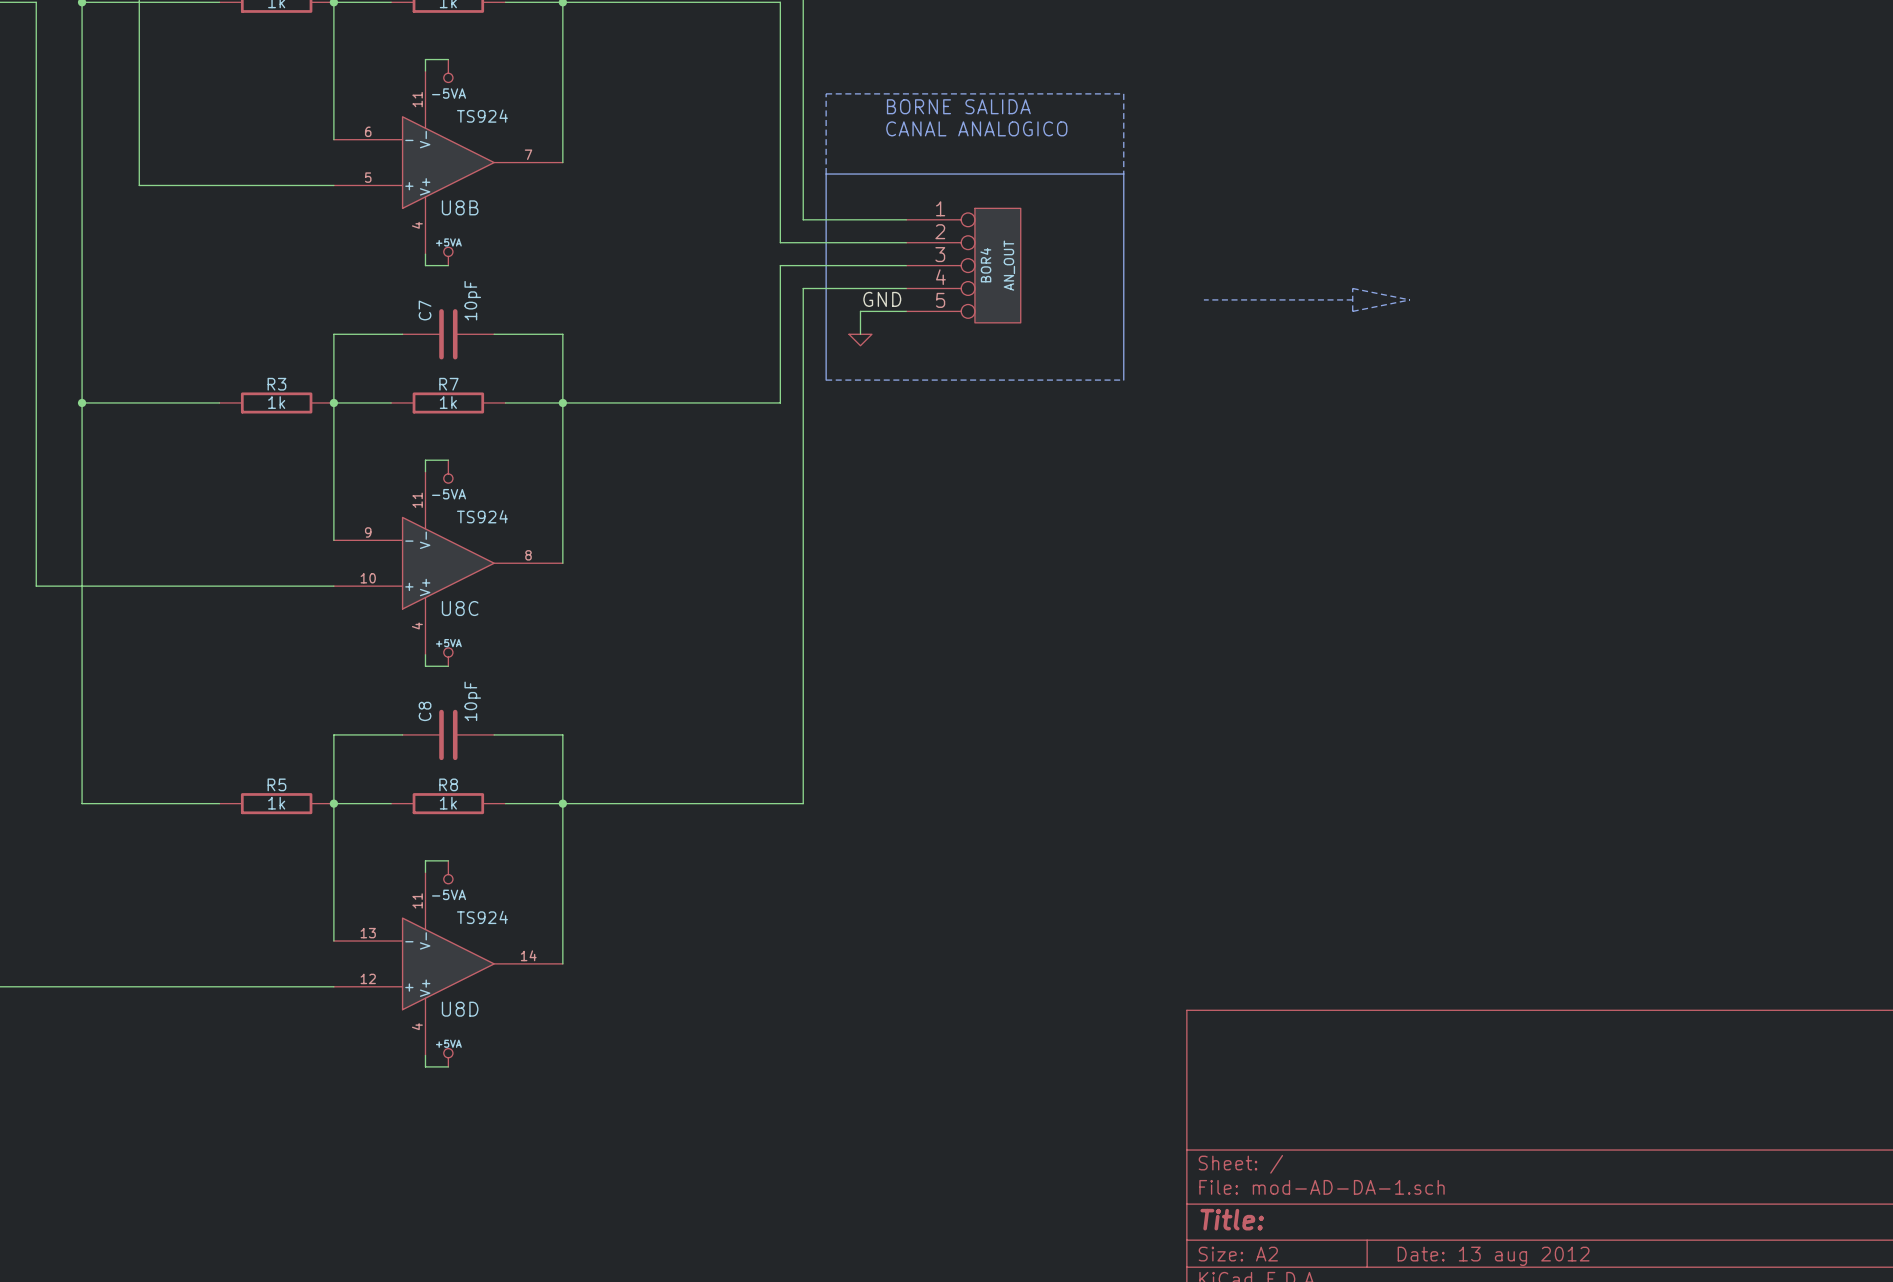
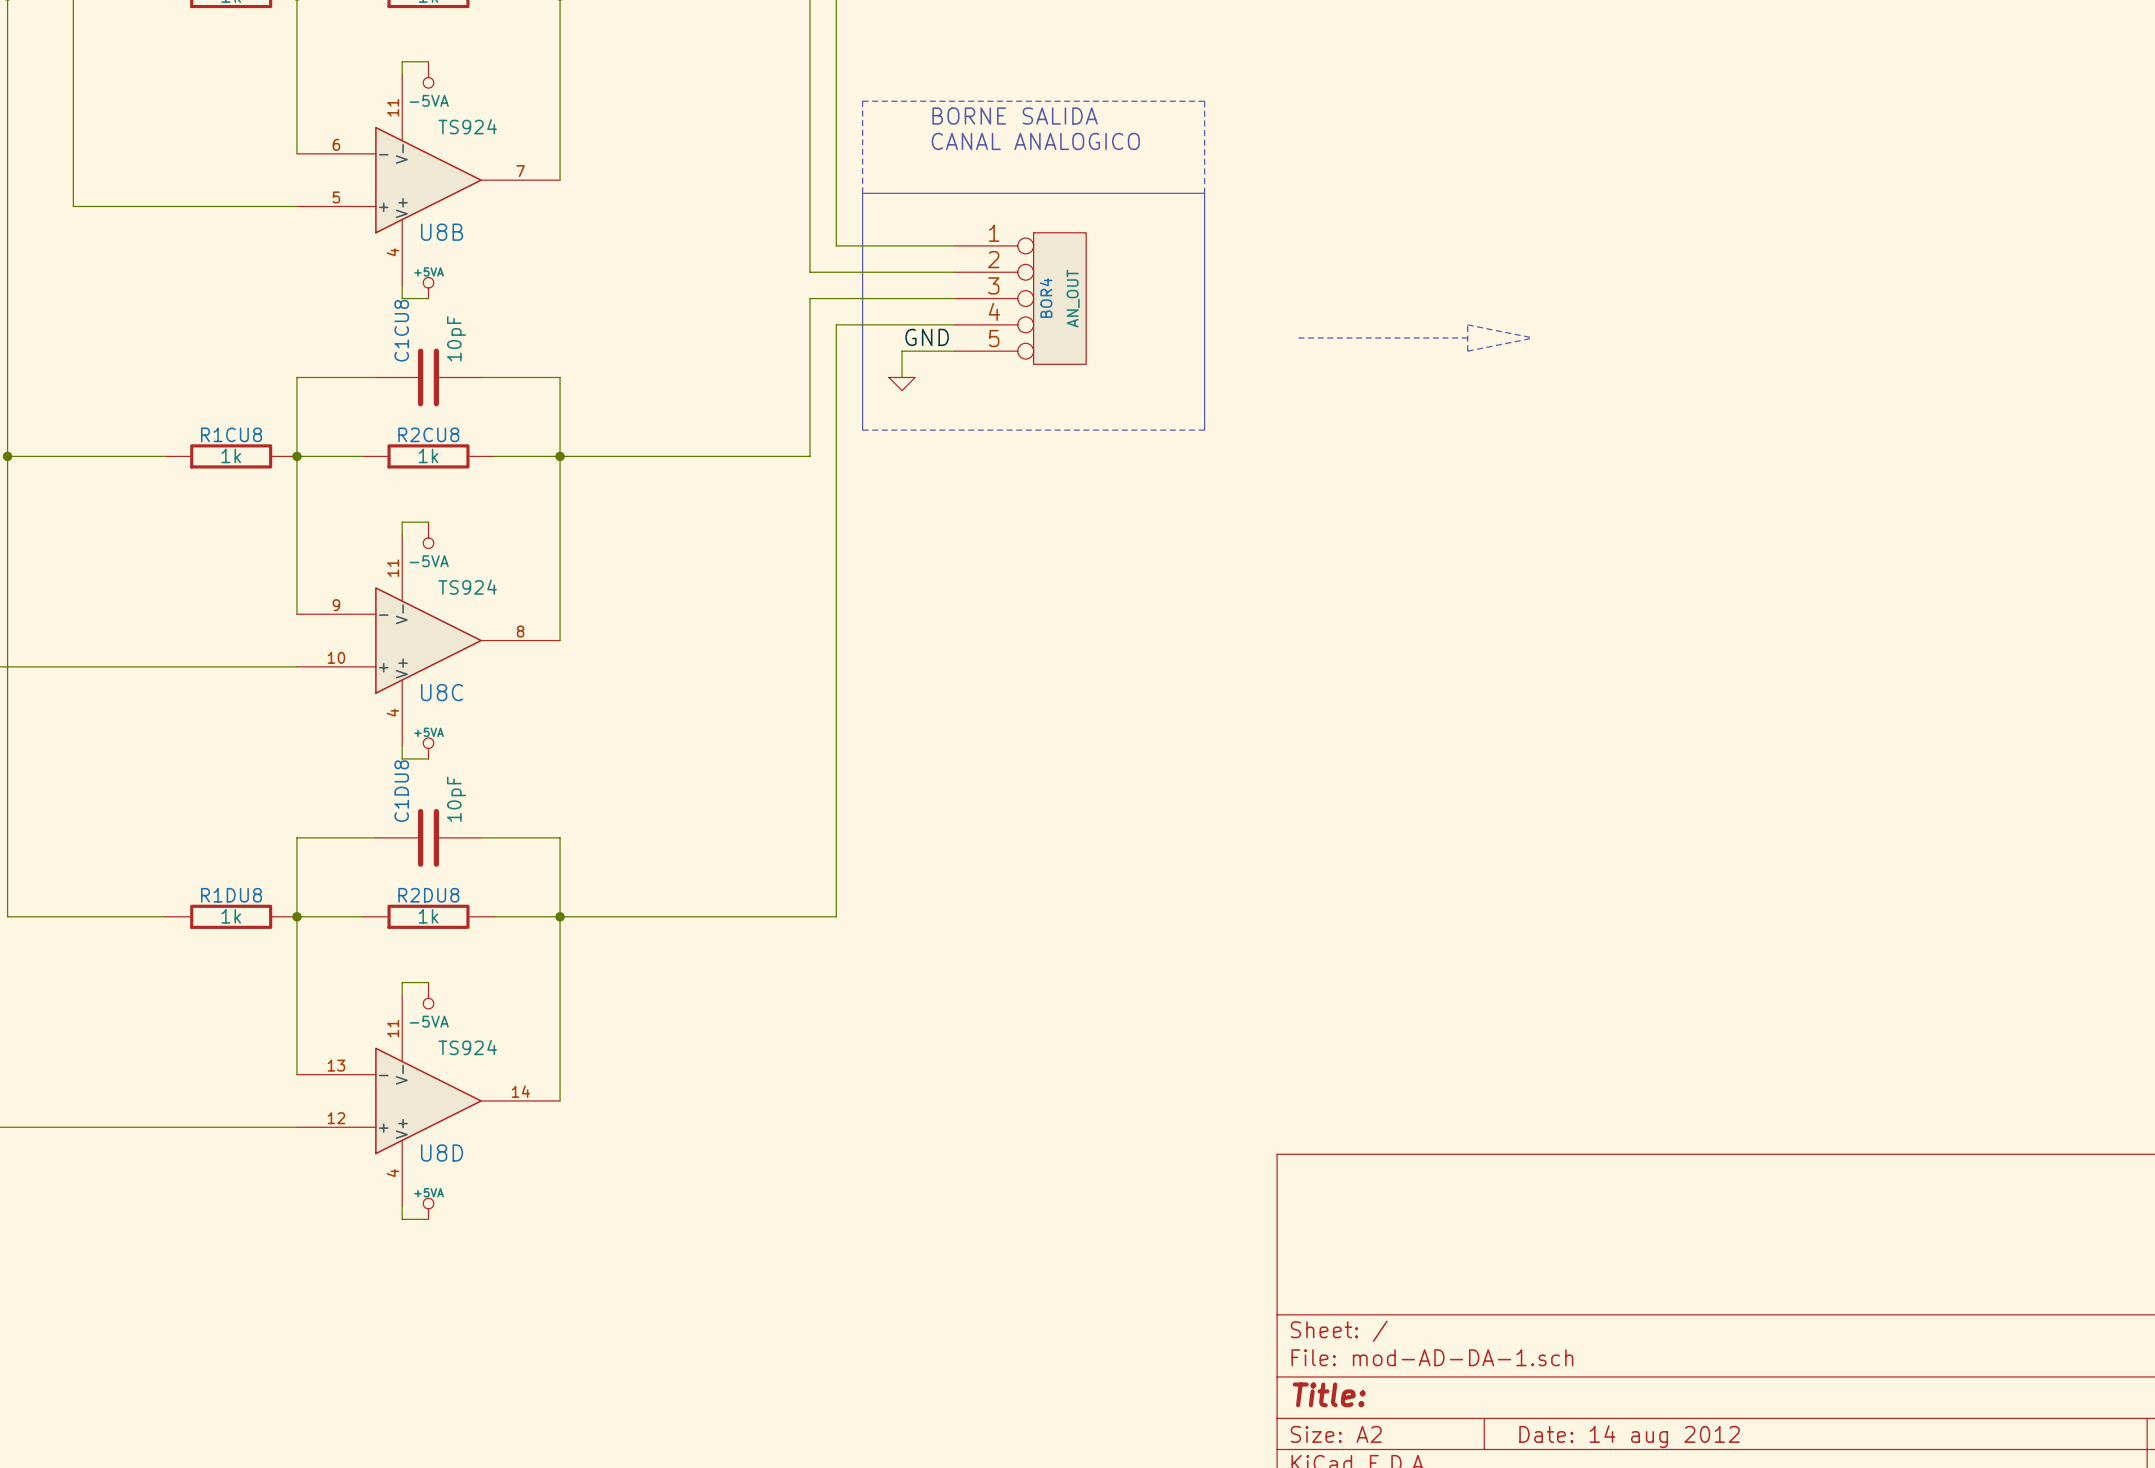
C7 name: C7 (425, 310) -> C1CU8 (401, 330)
R3 name: R3 (276, 384) -> R1CU8 (231, 434)
R7 name: R7 (448, 384) -> R2CU8 (428, 434)
C8 name: C8 (425, 711) -> C1DU8 (401, 791)
R5 name: R5 (276, 784) -> R1DU8 (231, 895)
R8 name: R8 (448, 784) -> R2DU8 (428, 895)
title block: Date: 13 aug 2012 (1493, 1256) -> Date: 14 aug 2012 (1629, 1436)

